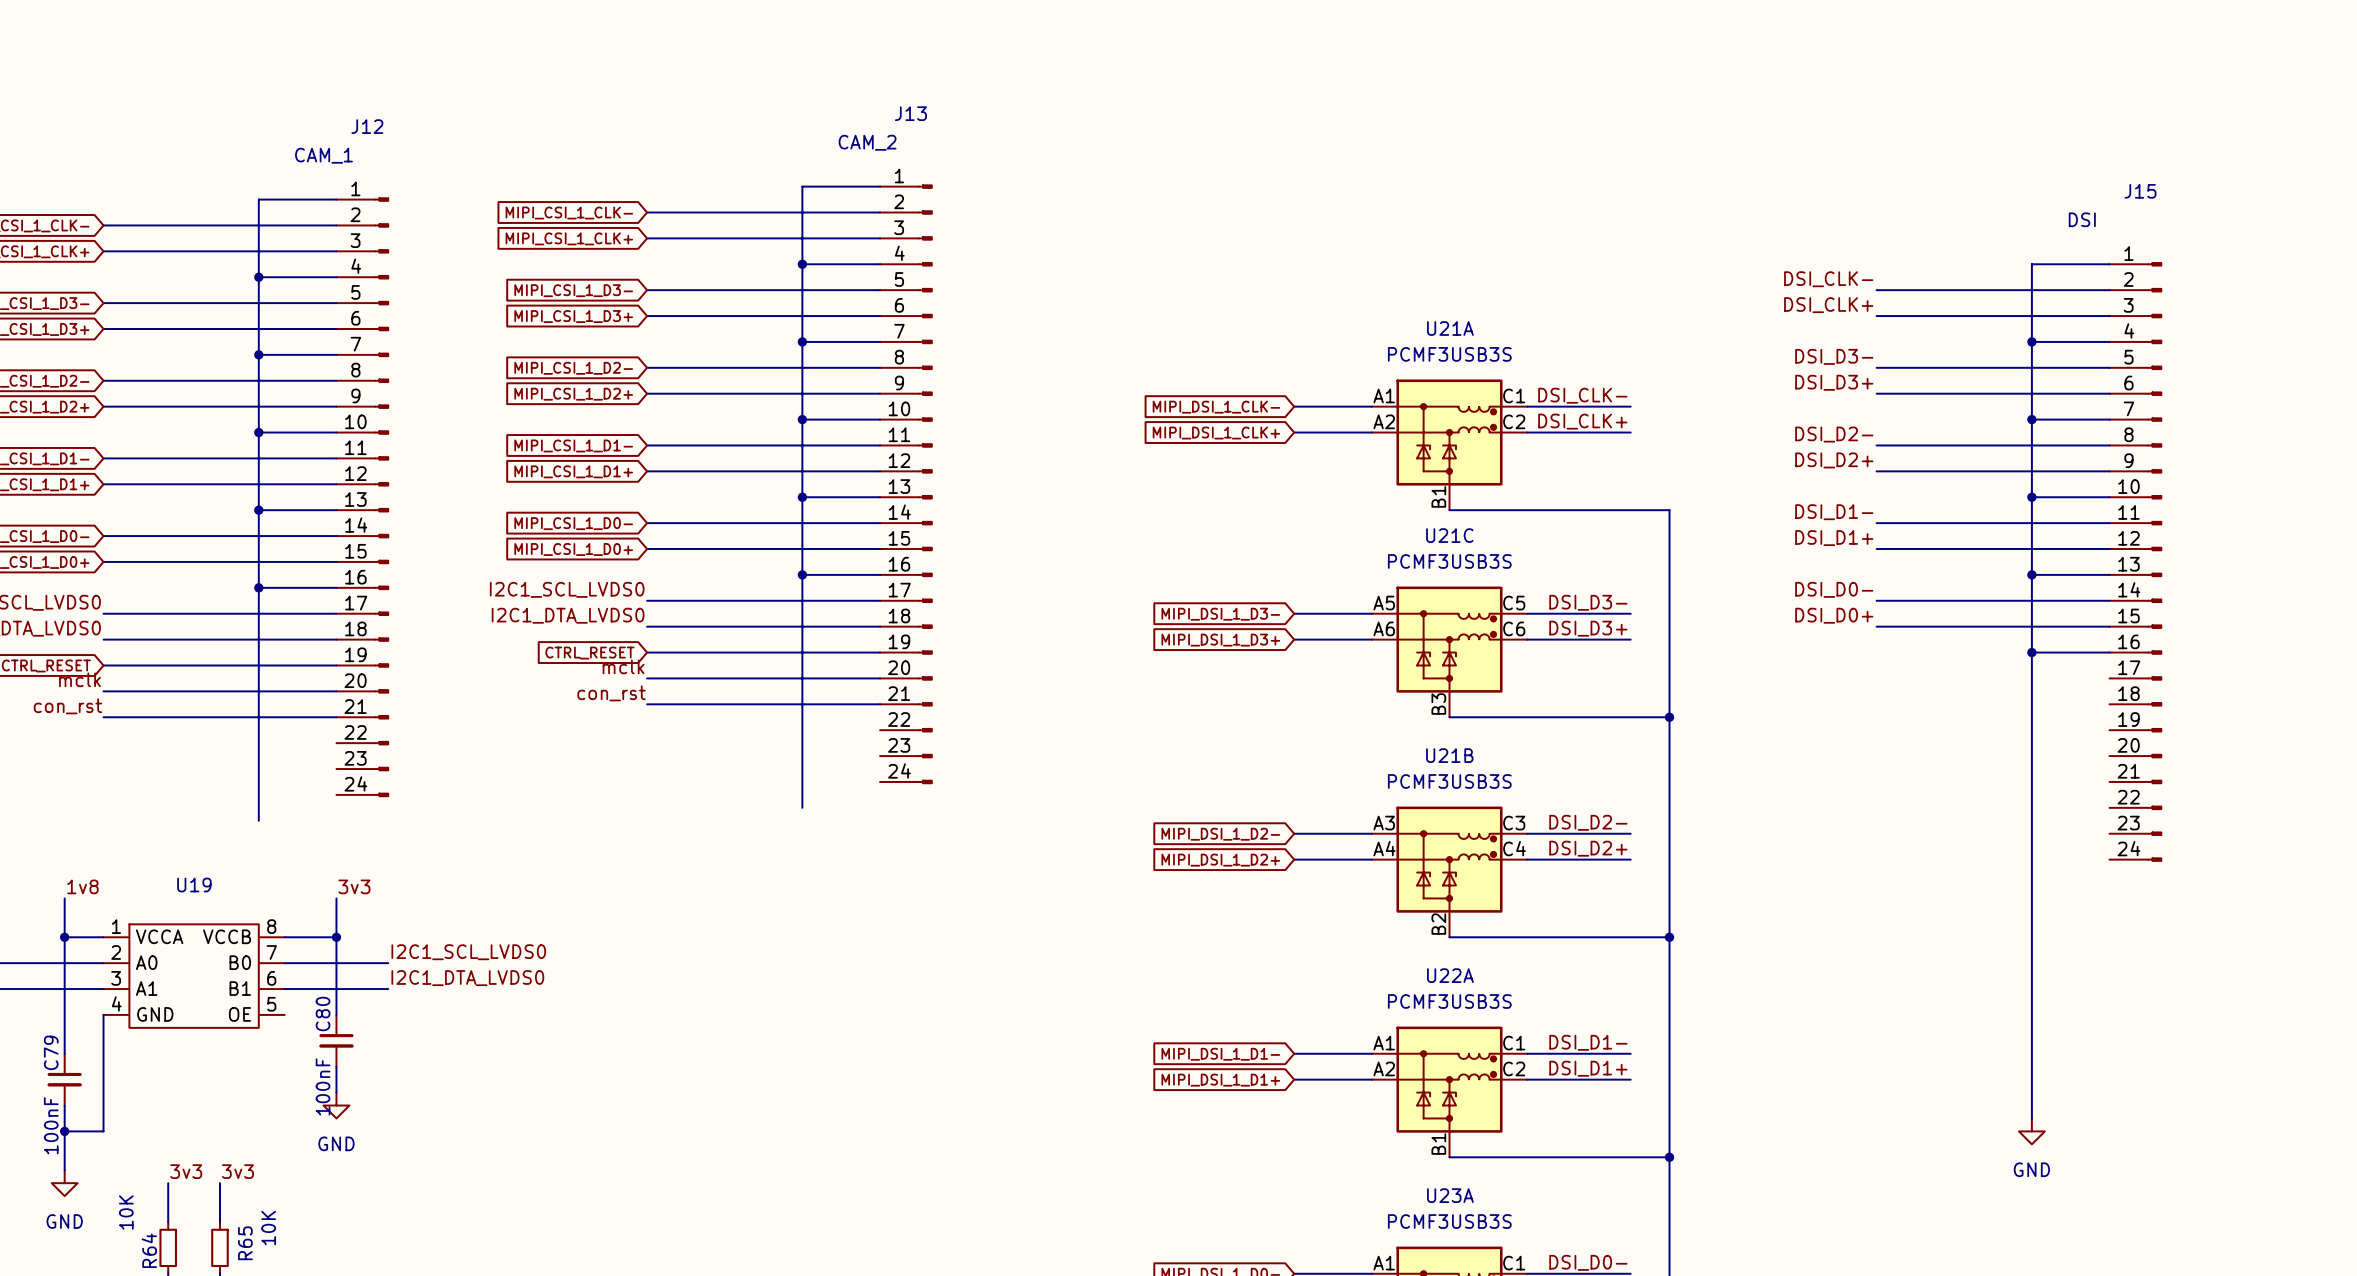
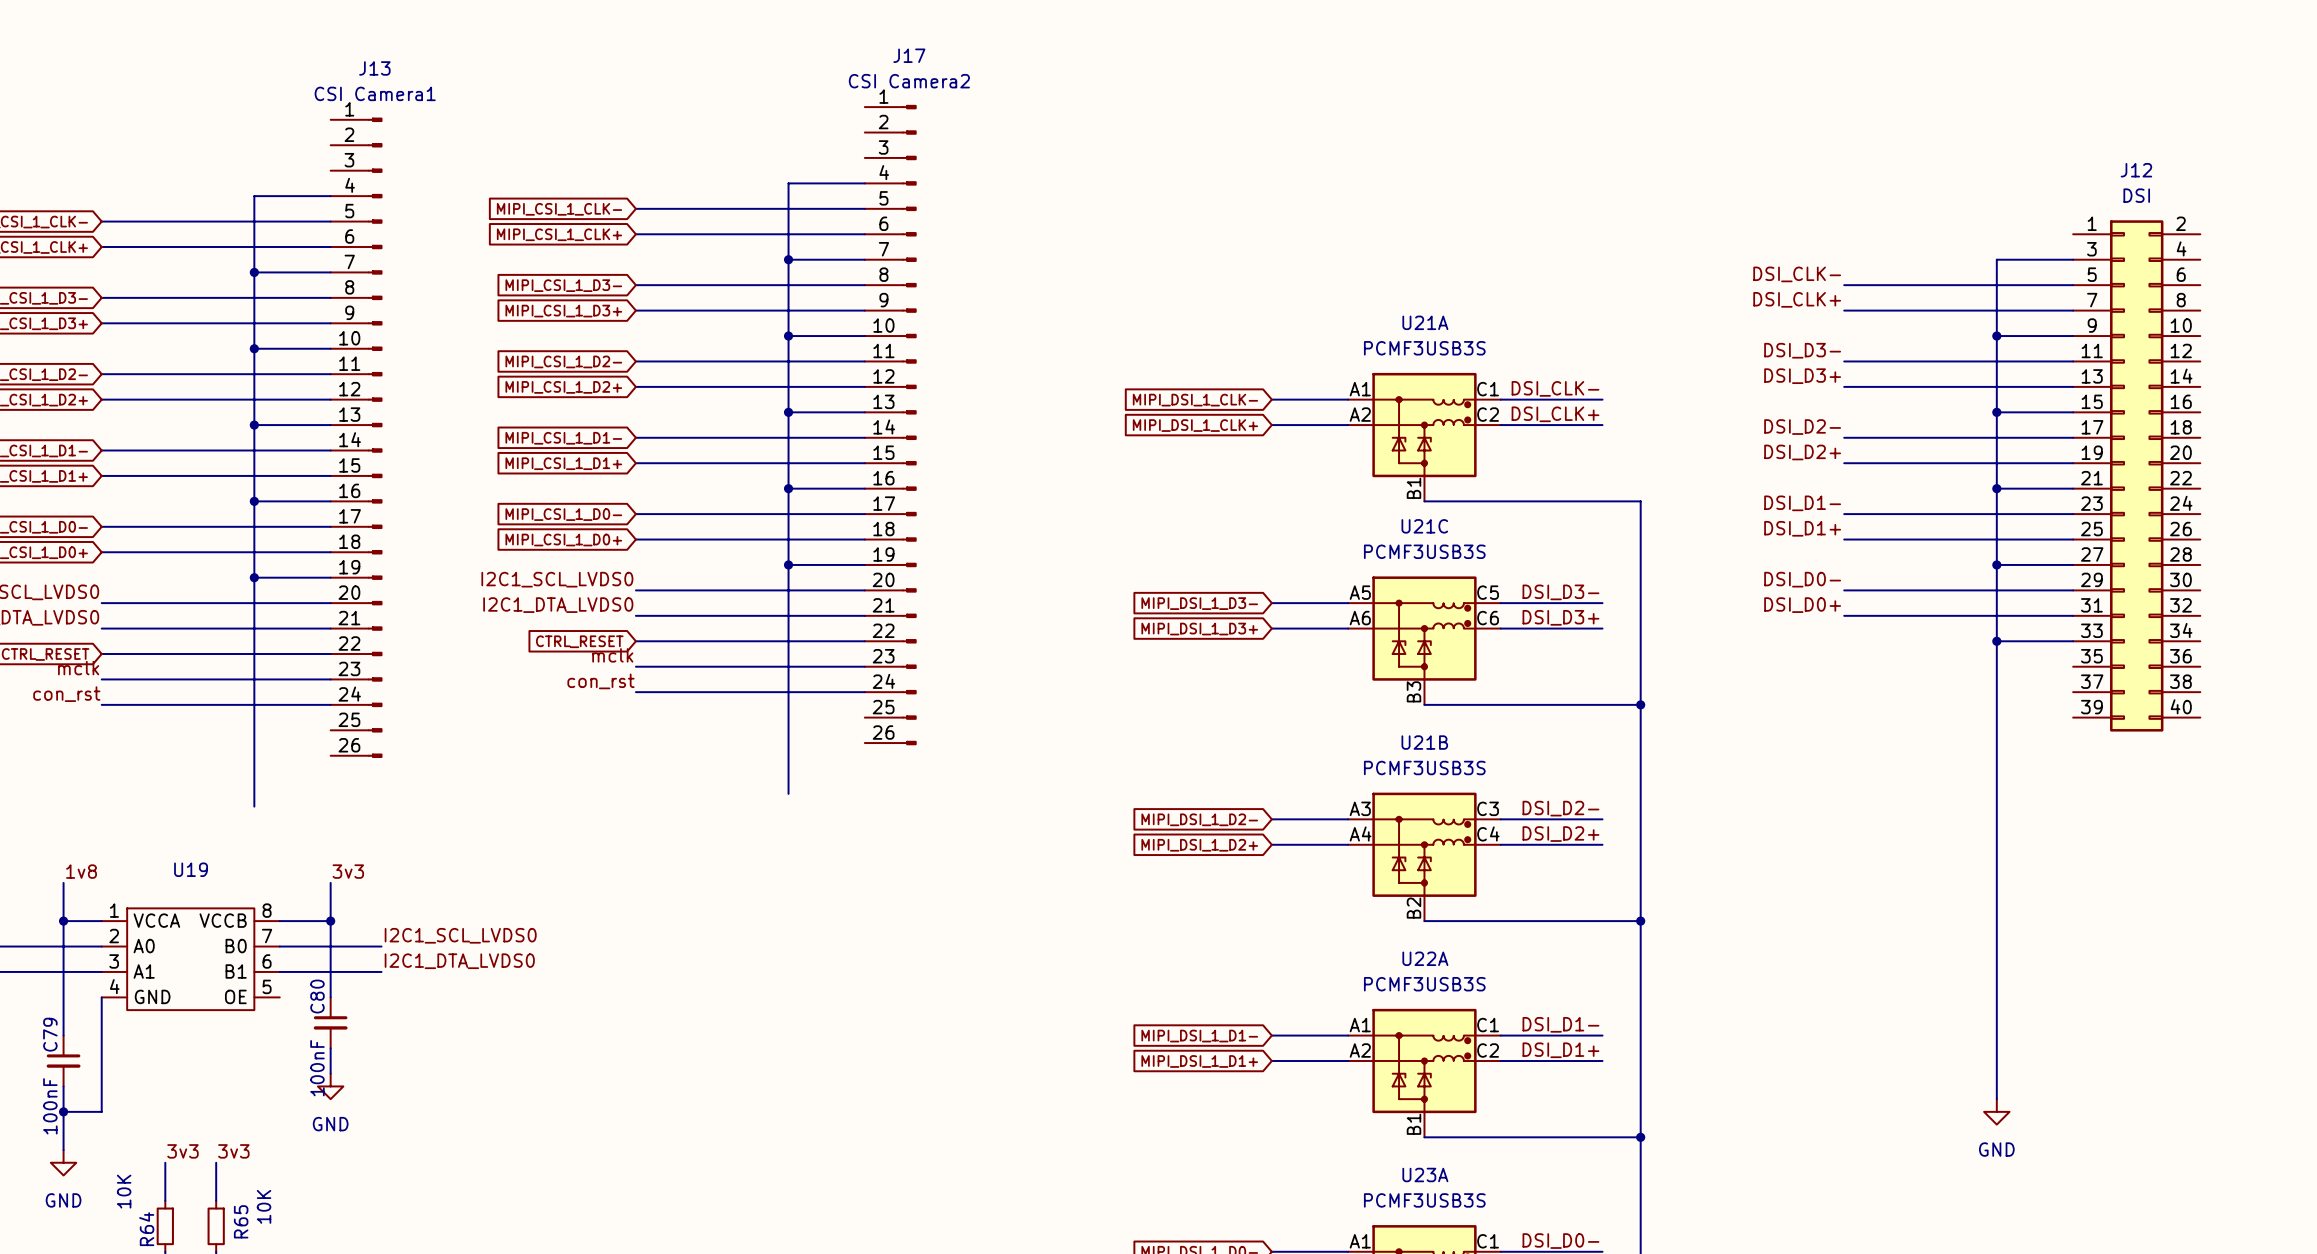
J12 name position: J12 (367, 126) -> J12 (2136, 170)
J13 value: CAM_2 (867, 142) -> CSI Camera1 (375, 93)
J12 value: CAM_1 (323, 155) -> DSI (2136, 195)
J13 symbol: [880, 184, 933, 785] -> [330, 117, 383, 758]
J12 symbol: [336, 197, 390, 797] -> [2073, 220, 2201, 732]
J17: none -> CSI Camera2 (890, 425)
J15: DSI (2135, 561) -> none

